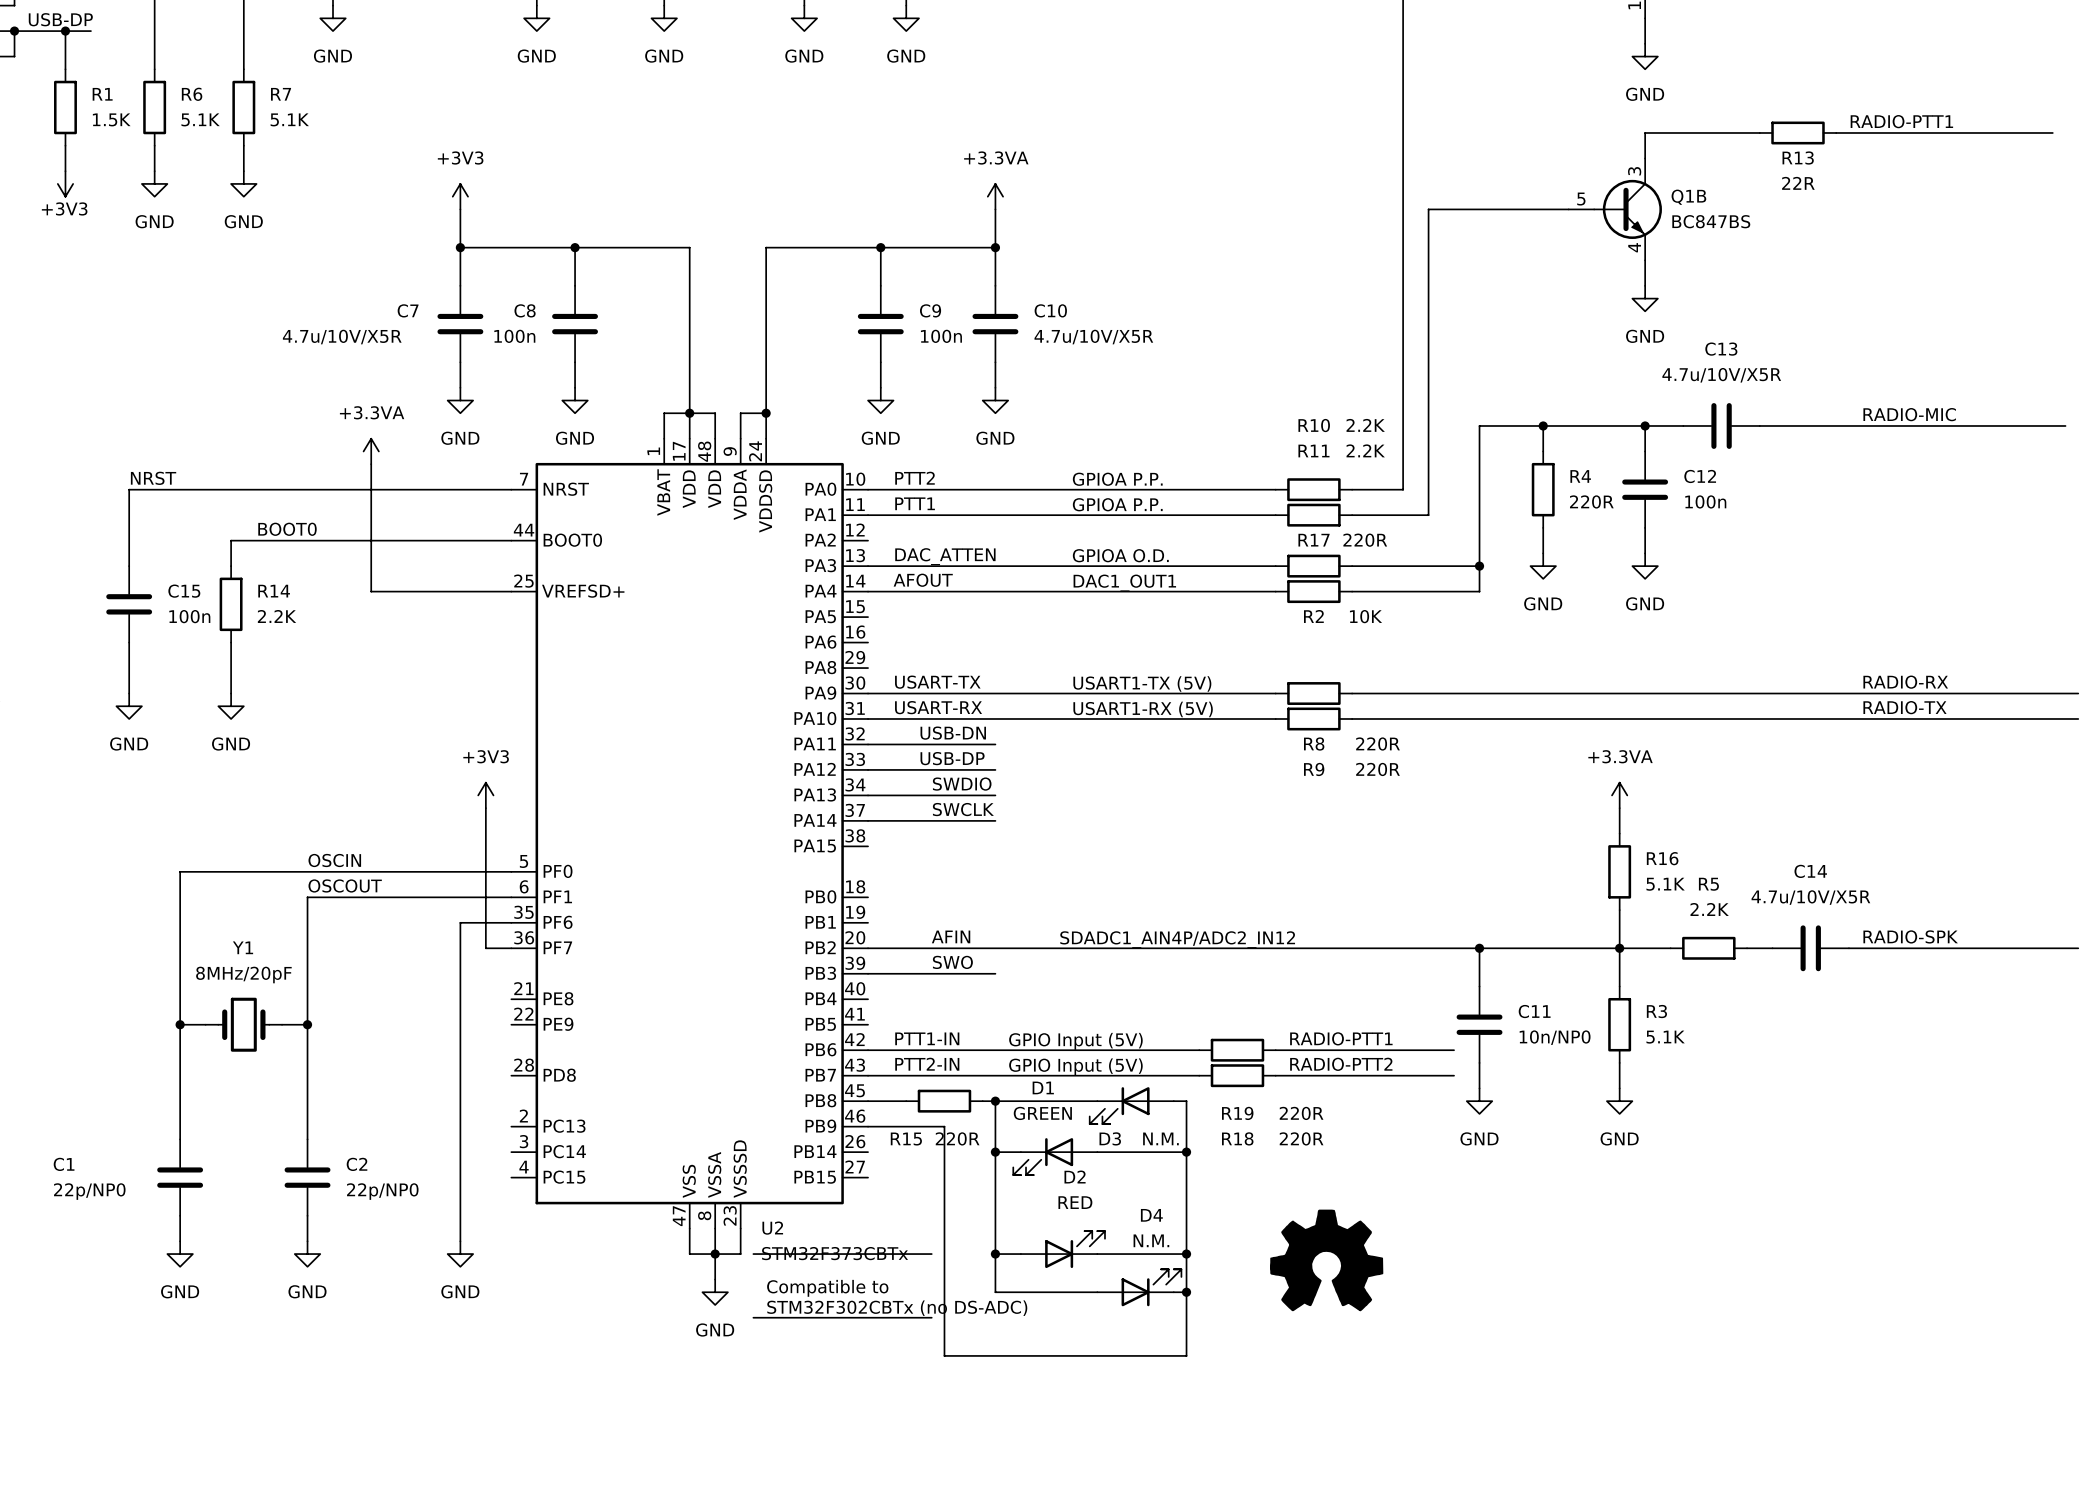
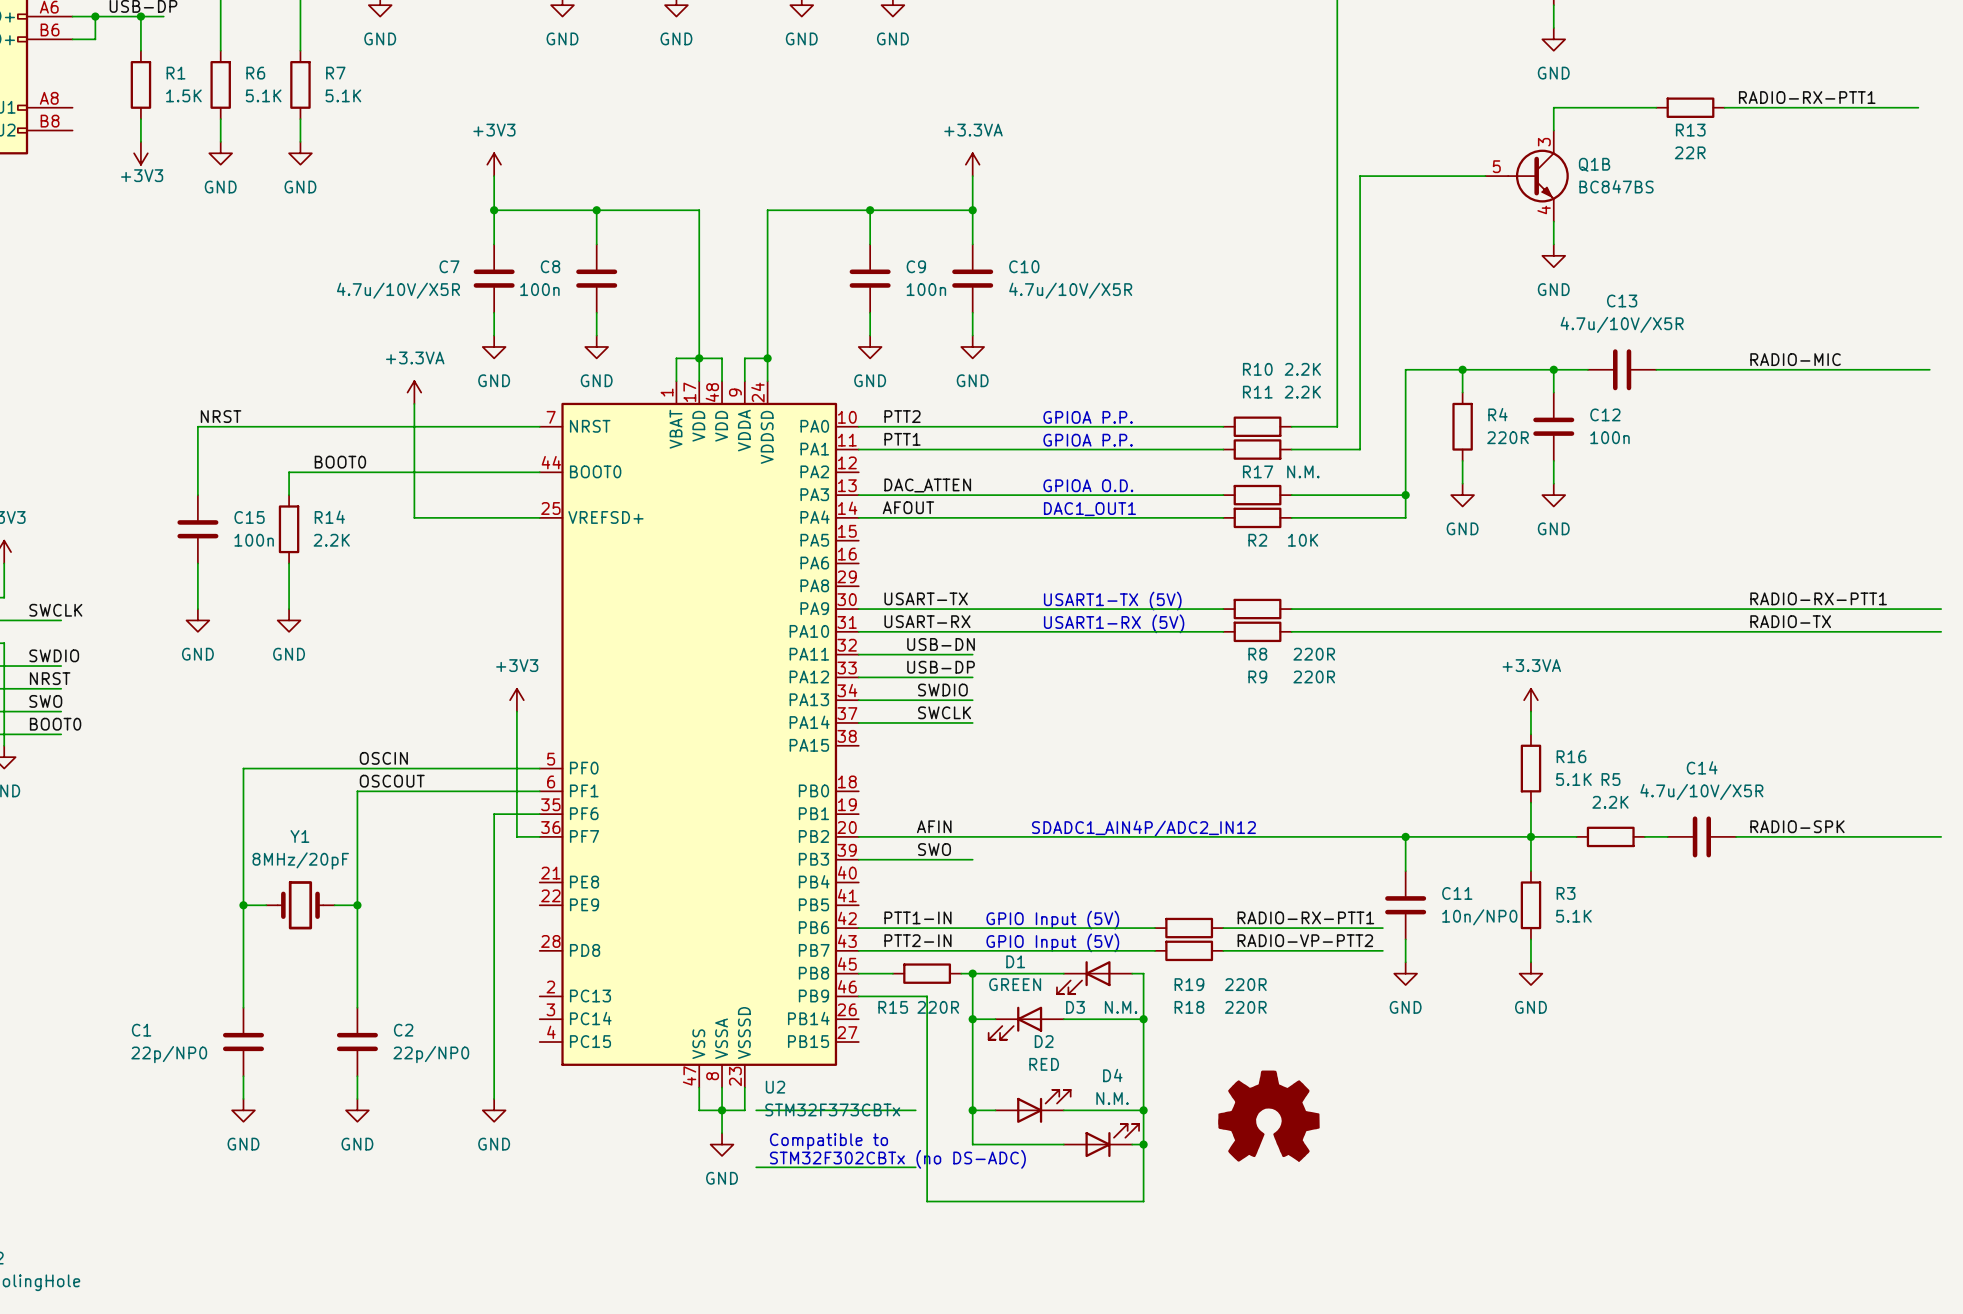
label: RADIO-PTT1 (1901, 121) -> RADIO-RX-PTT1 (1807, 97)
R17 value: 220R (1365, 540) -> N.M. (1303, 471)
label: RADIO-RX (1905, 682) -> RADIO-RX-PTT1 (1818, 598)
label: RADIO-PTT1 (1341, 1038) -> RADIO-RX-PTT1 (1305, 917)
label: RADIO-PTT2 (1341, 1064) -> RADIO-VP-PTT2 (1305, 940)

